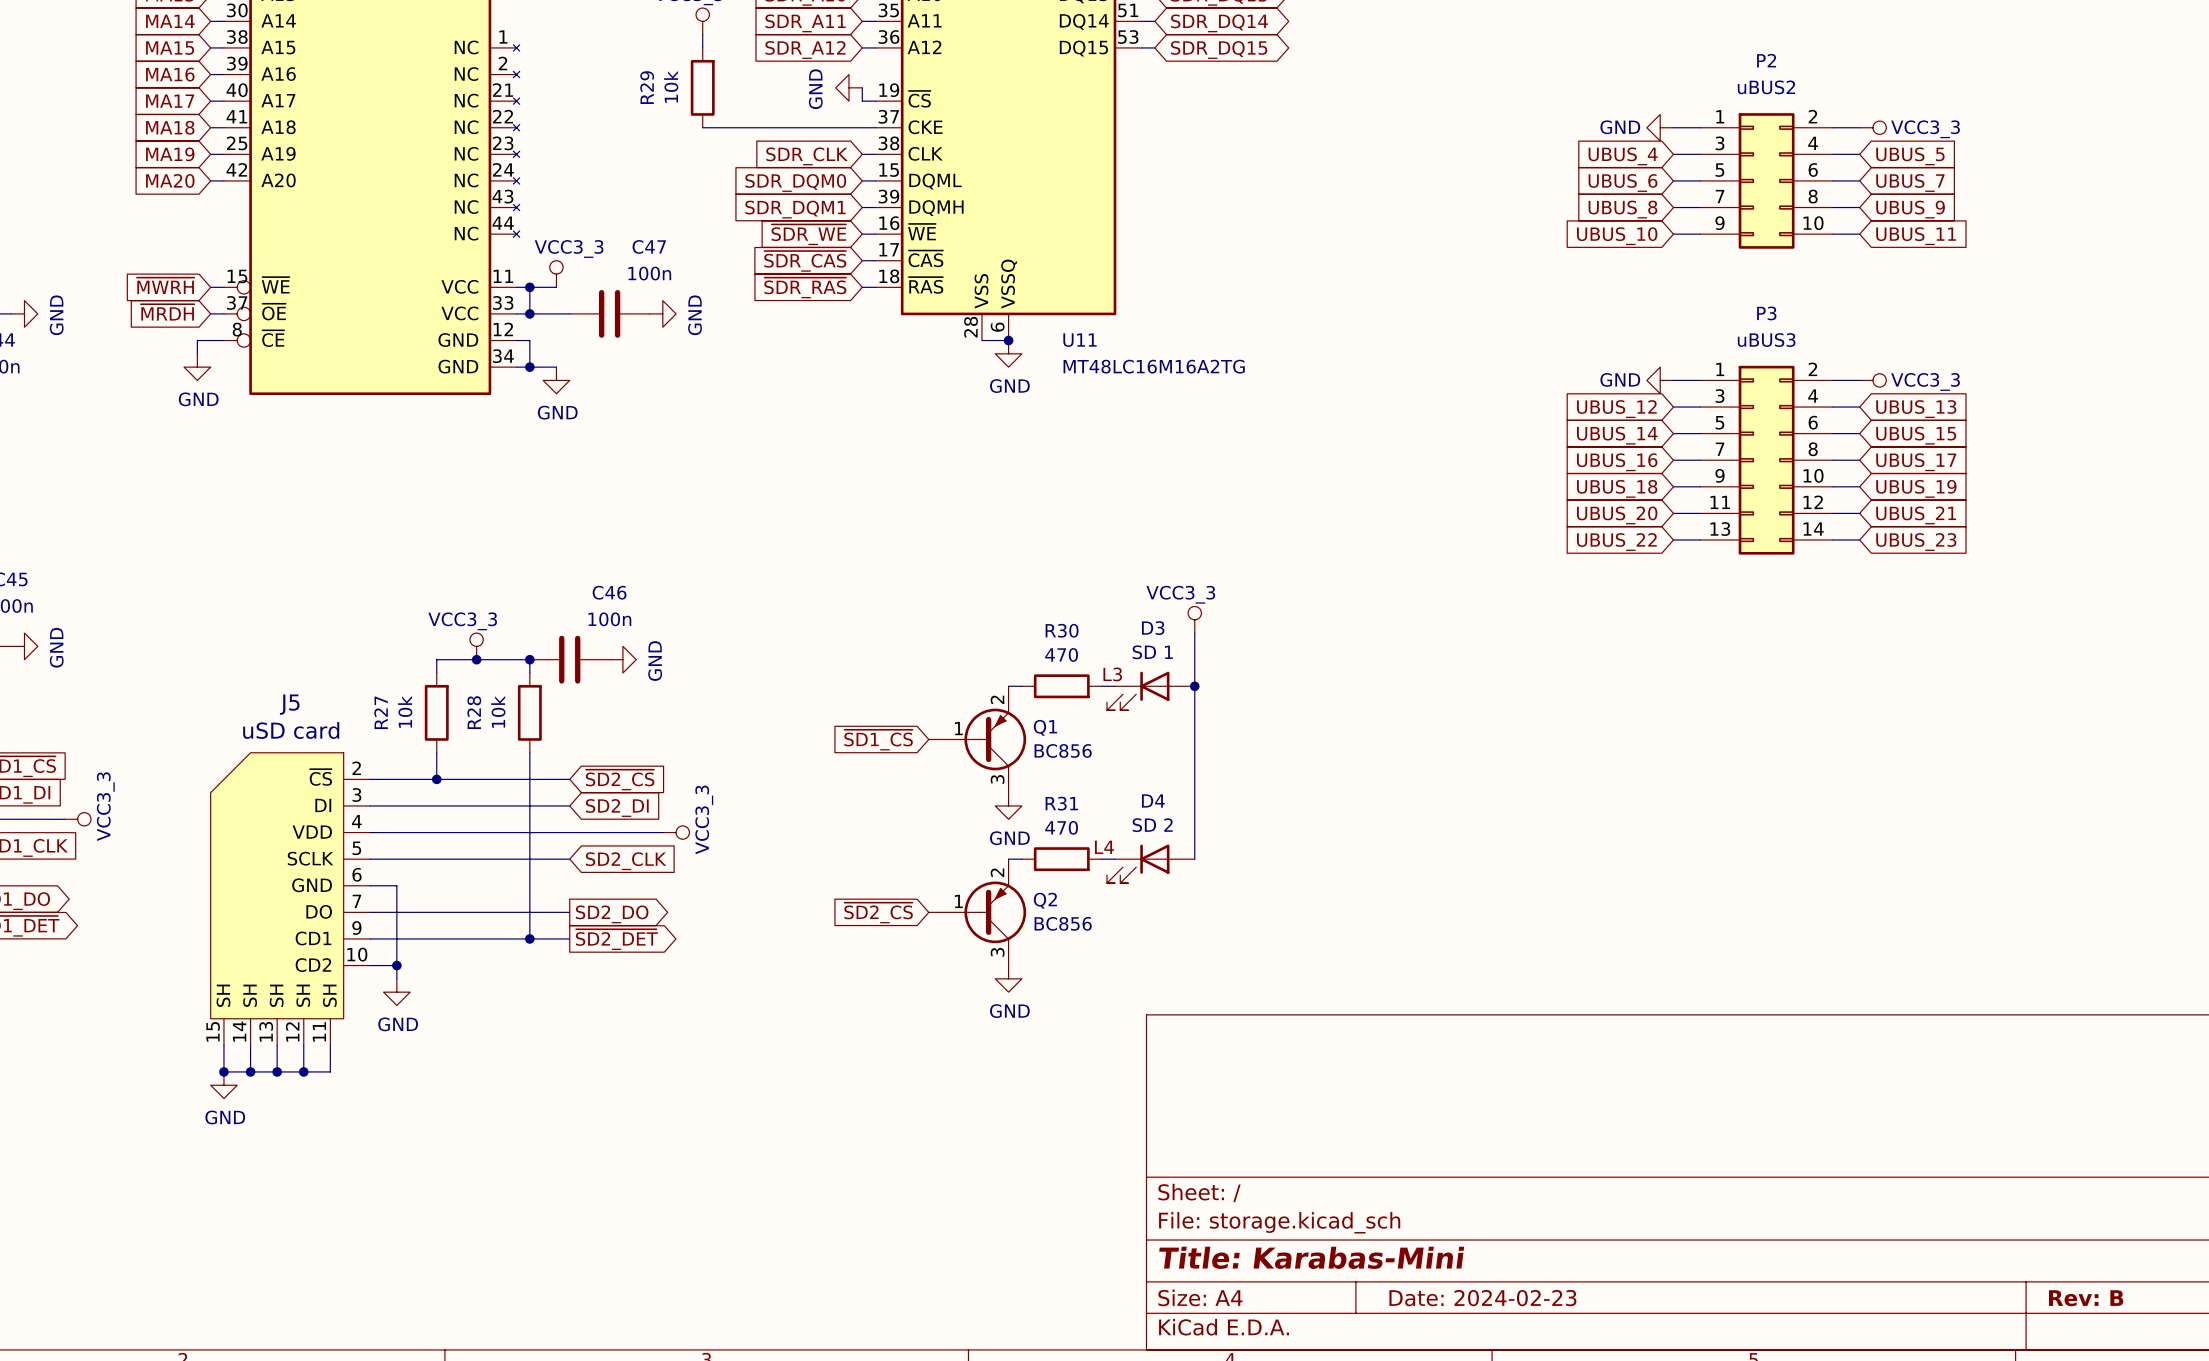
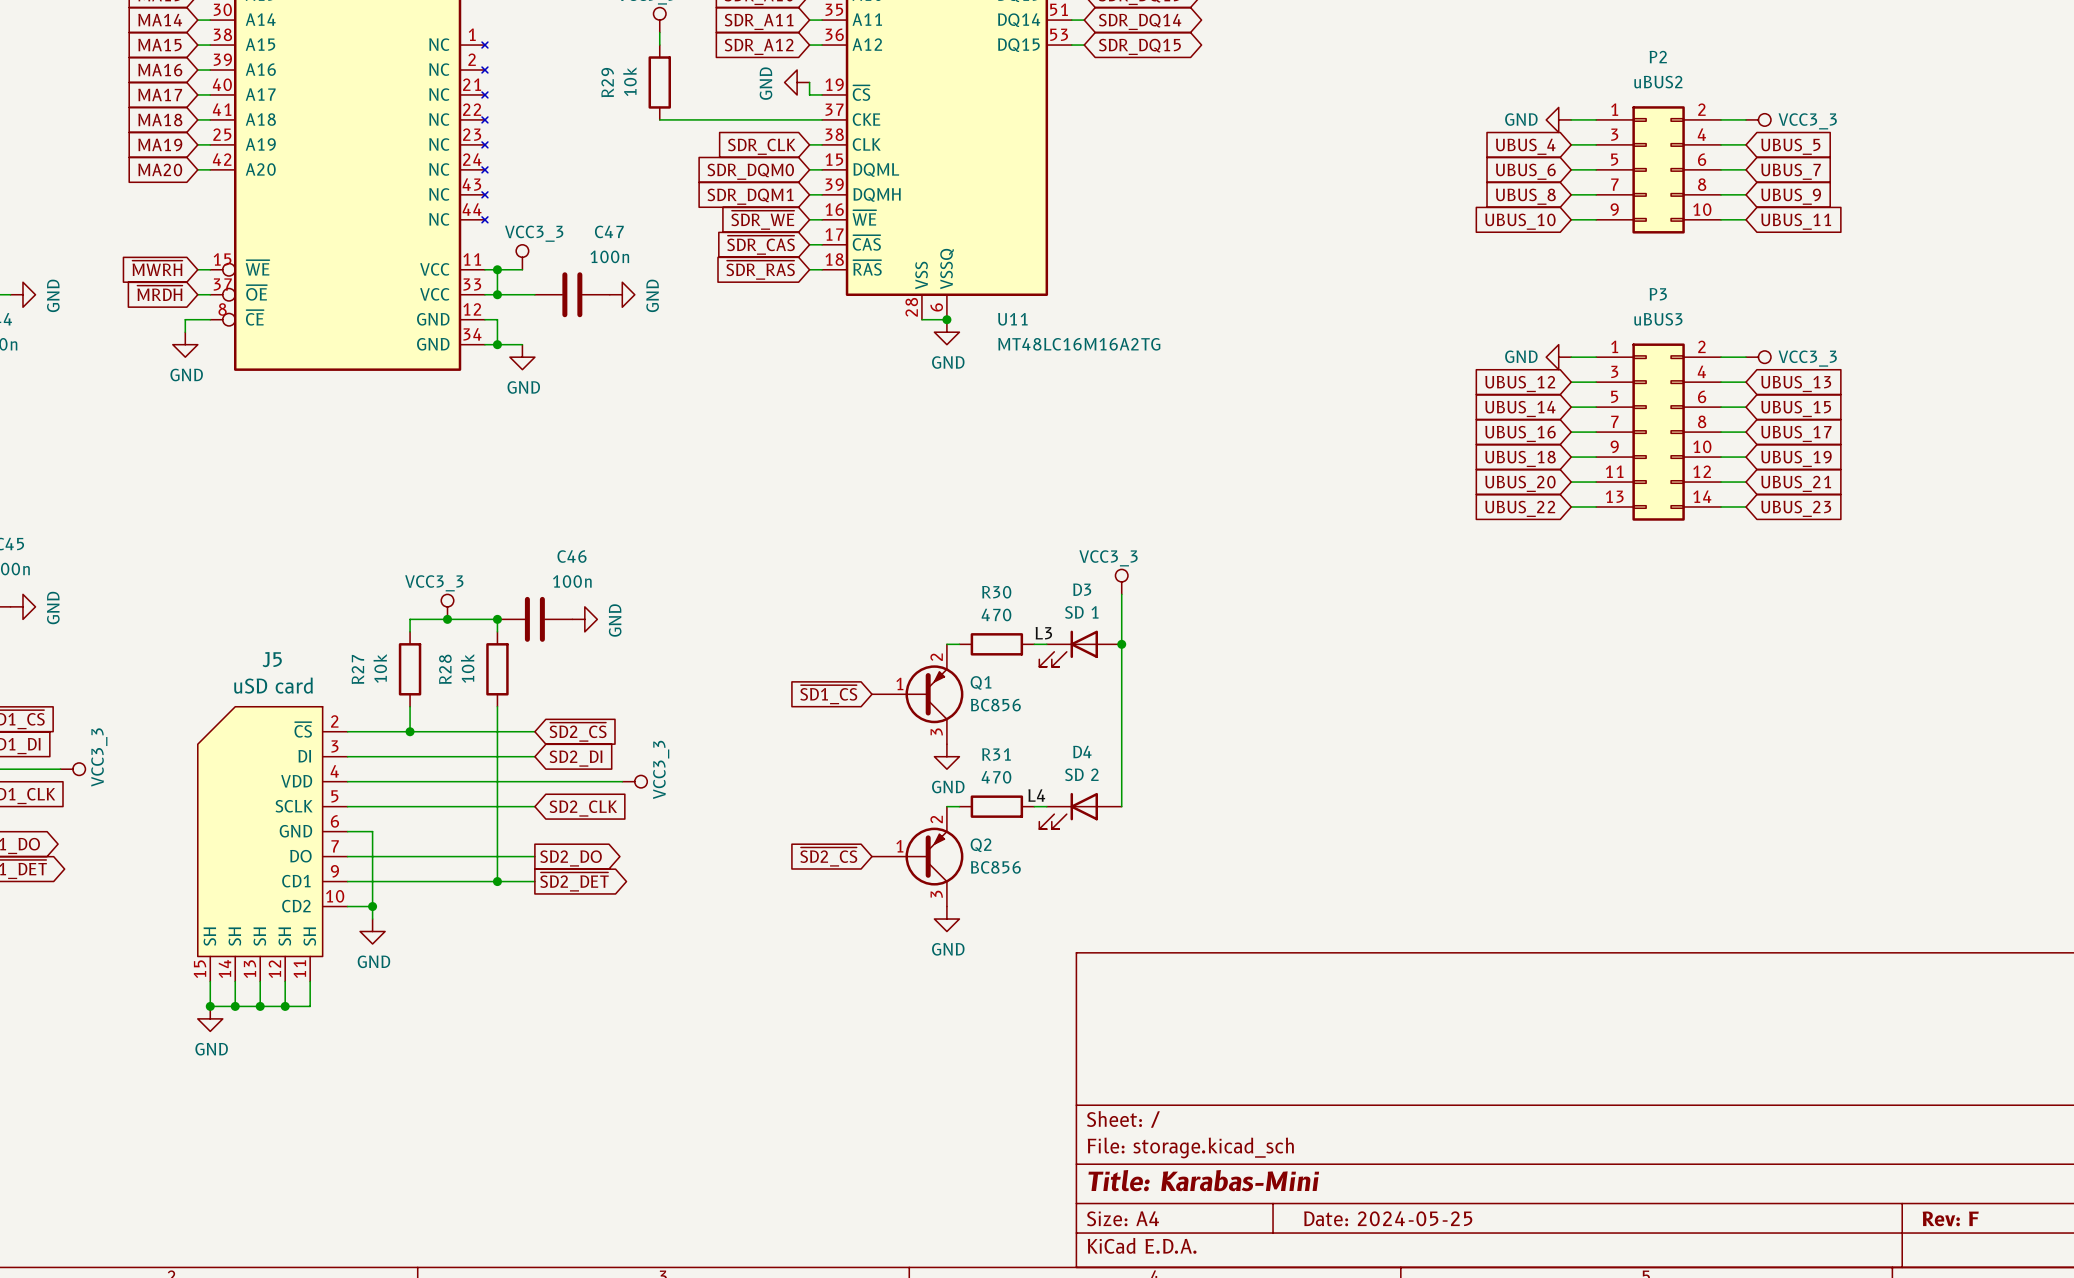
title block: Date: 2024-02-23 (1482, 1298) -> Date: 2024-05-25 (1388, 1218)
title block: Rev: B (2086, 1298) -> Rev: F (1950, 1218)

